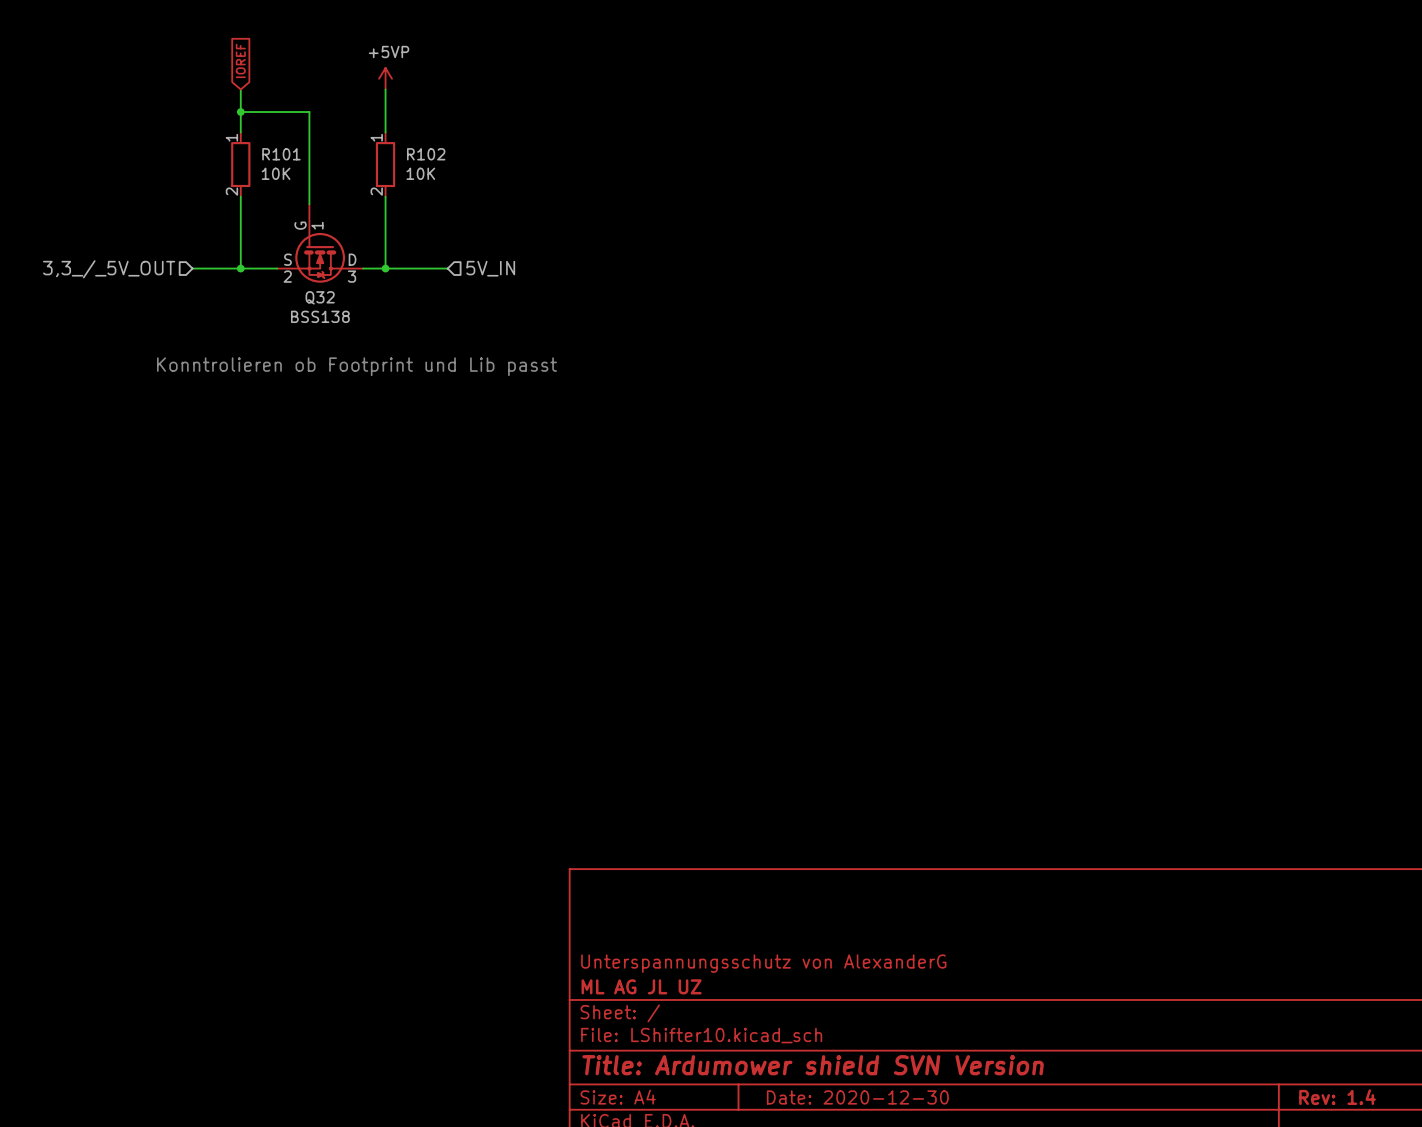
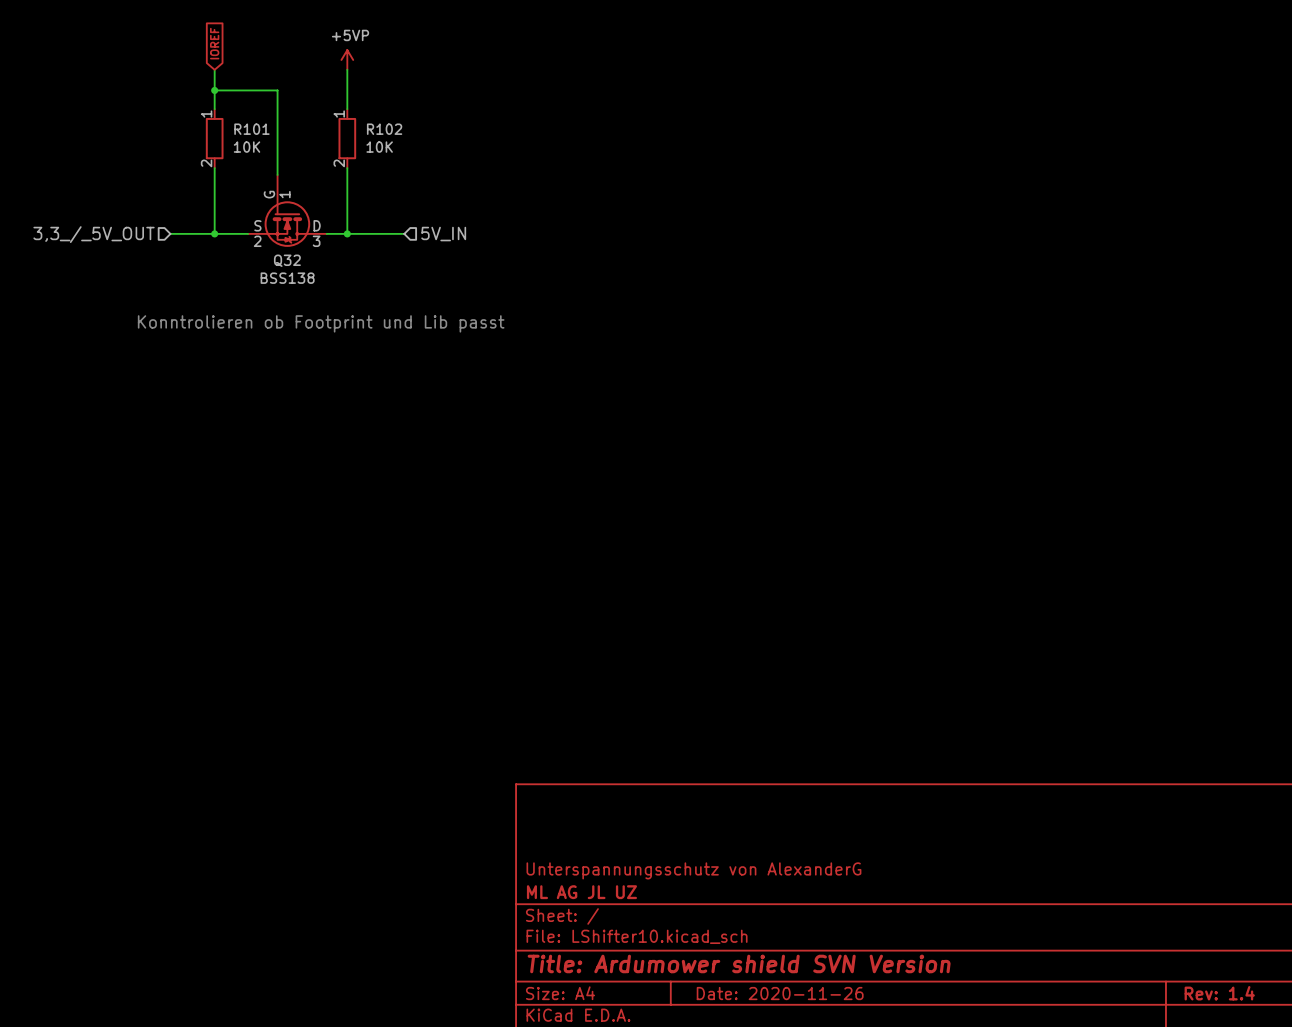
title block: Date: 2020-12-30 (857, 1097) -> Date: 2020-11-26 (780, 993)

